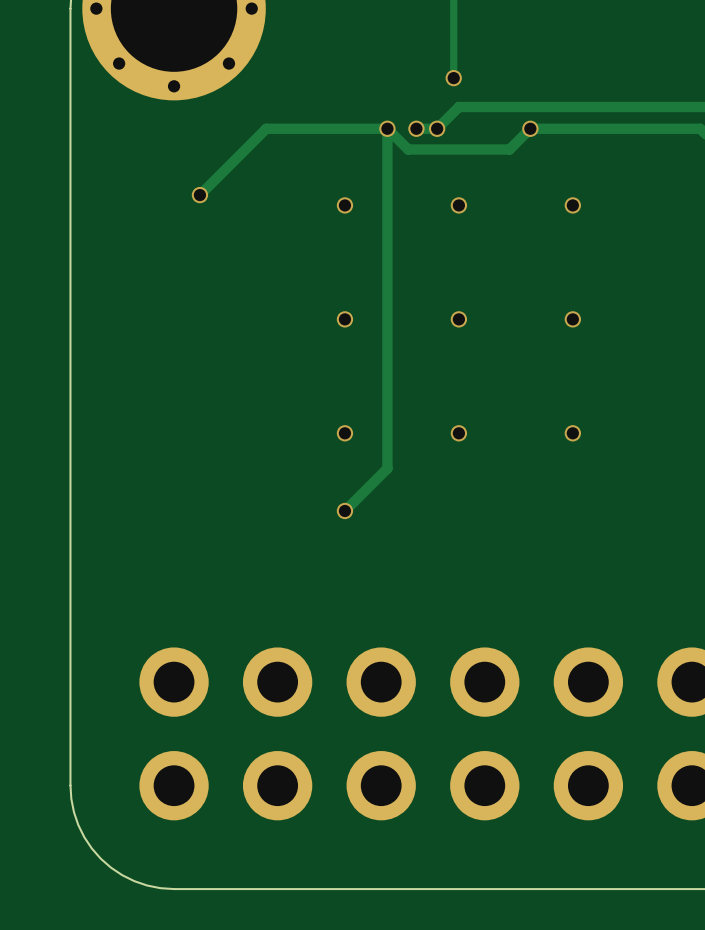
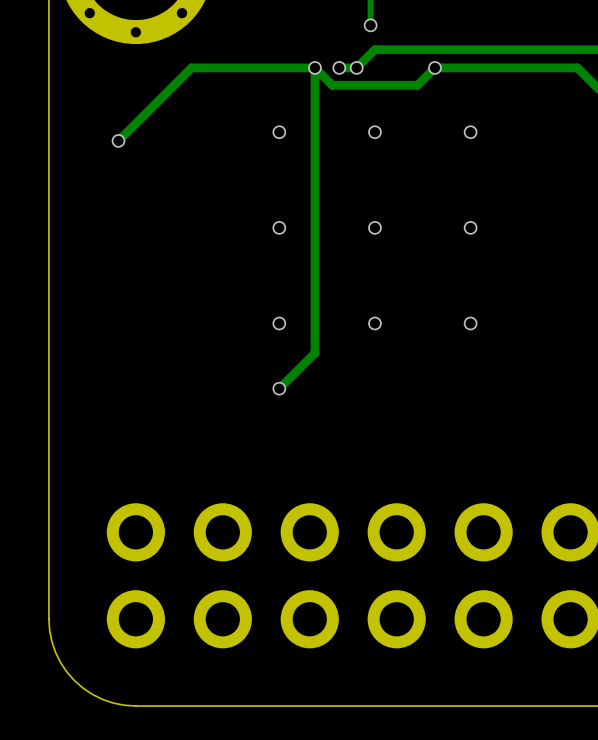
track: (266, 128) (199, 195) -> (213, 67) (191, 67) (118, 140)
via position: (199, 195) -> (118, 140)

